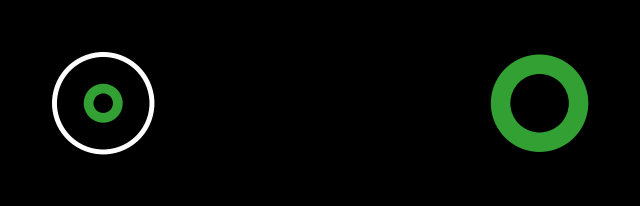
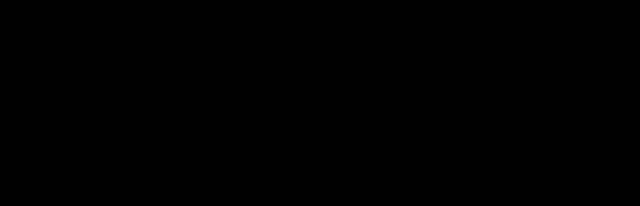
round board edge: [52, 52, 155, 155] -> none
via: (103, 103) -> none
via: (539, 103) -> none

